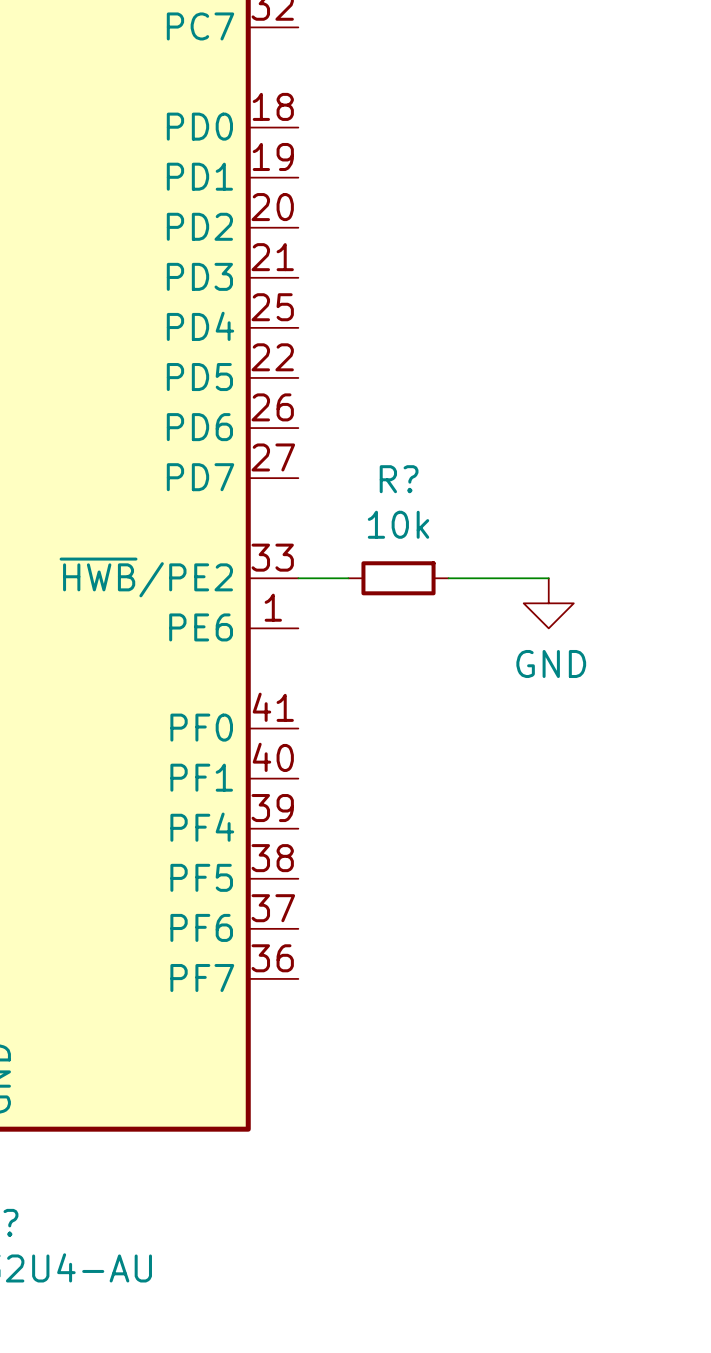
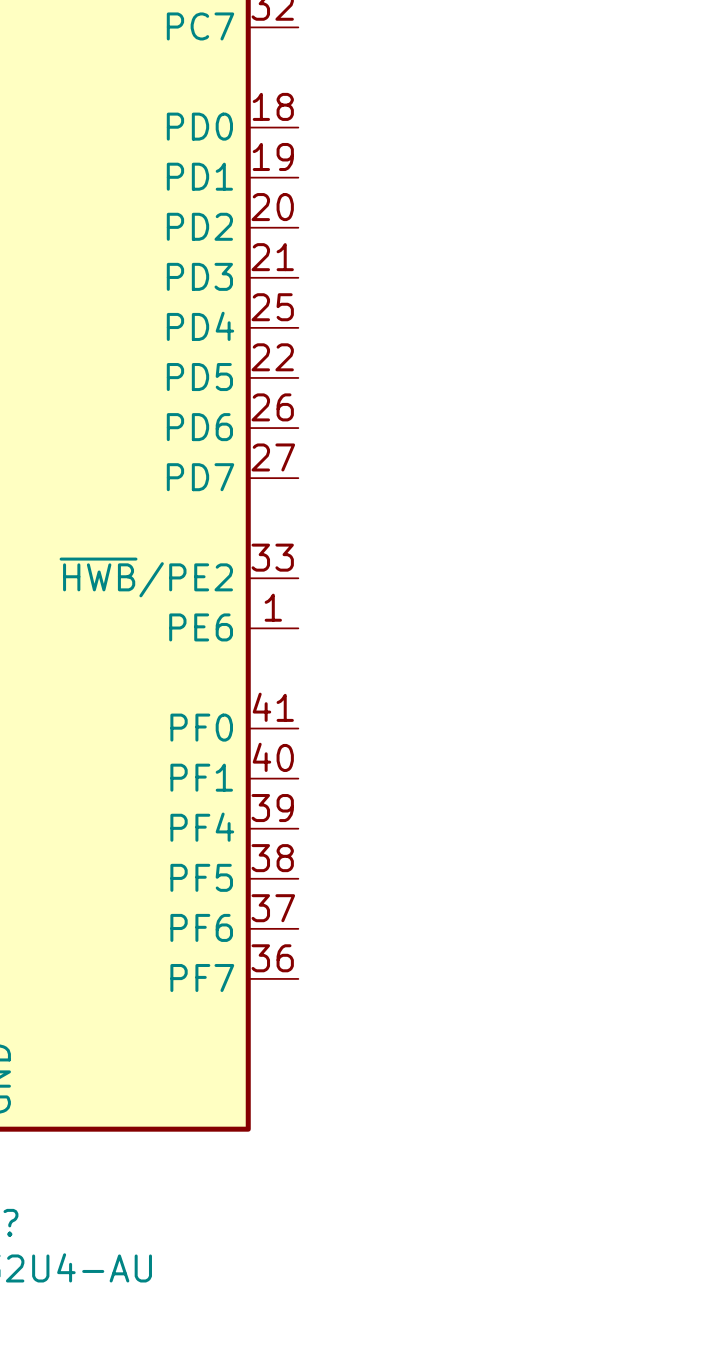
wire: (298, 578) (348, 578) -> none
R?: 10k (398, 578) -> none
wire: (448, 578) (548, 578) -> none
power symbol: GND (548, 603) -> none

